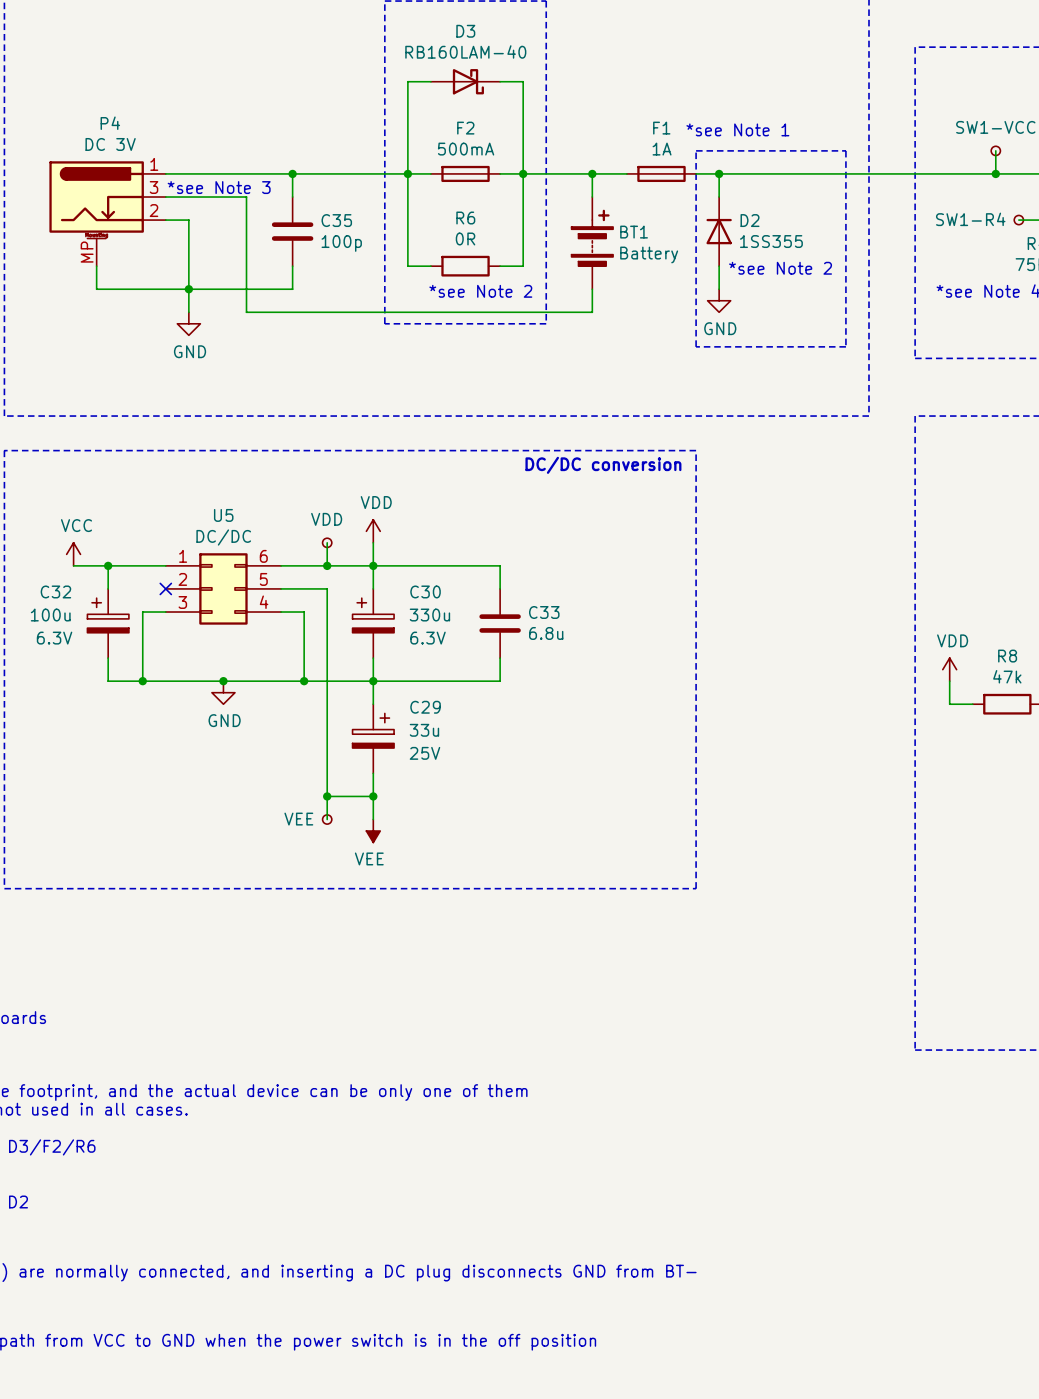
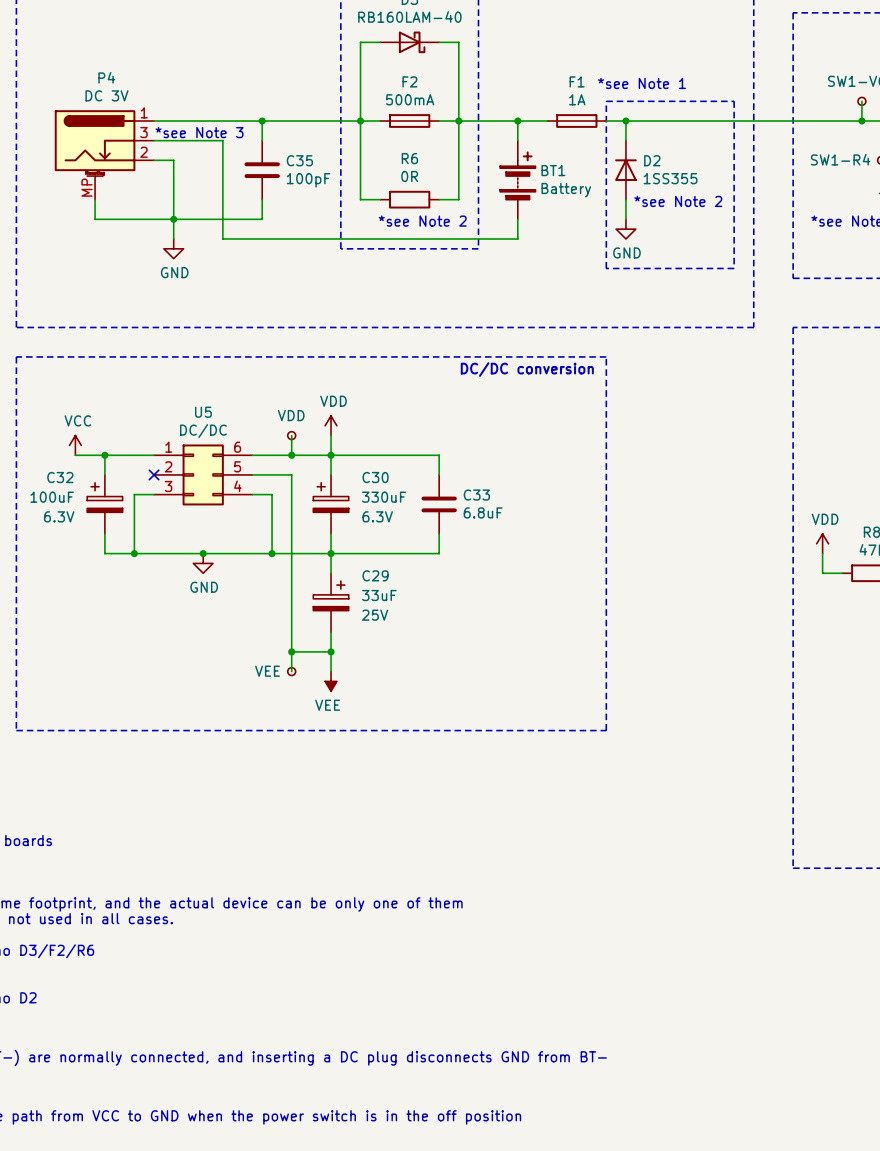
C35 value: 100p (341, 243) -> 100pF (308, 180)
C32 value: 100u (50, 615) -> 100uF (52, 497)
C30 value: 330u (429, 615) -> 330uF (384, 497)
C33 value: 6.8u (546, 633) -> 6.8uF (483, 512)
C29 value: 33u (424, 730) -> 33uF (379, 595)

